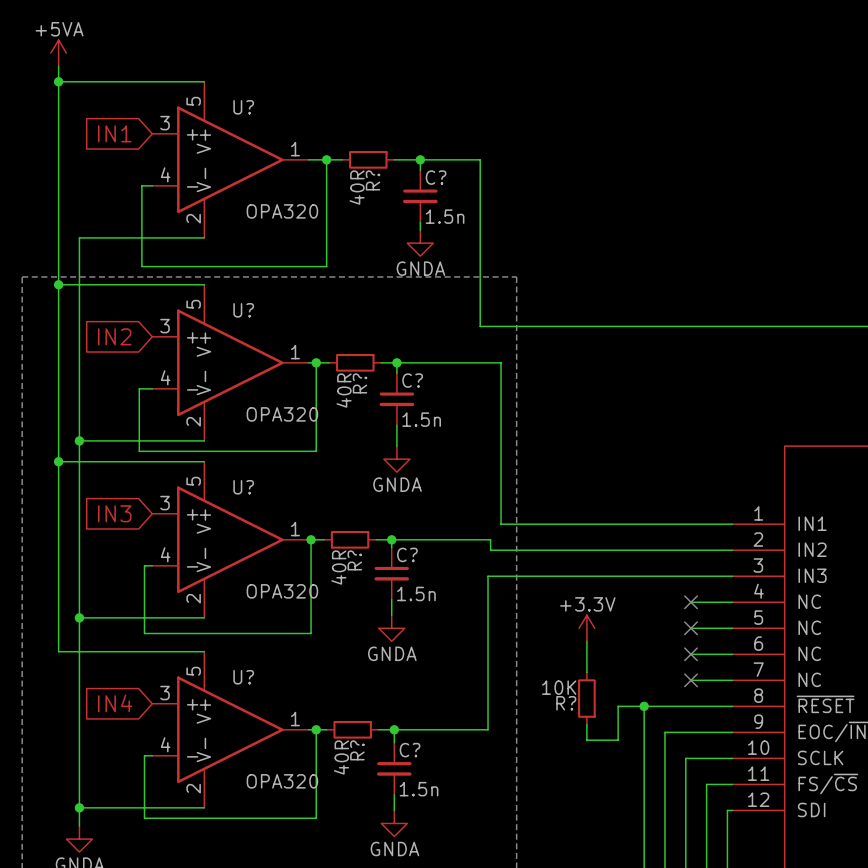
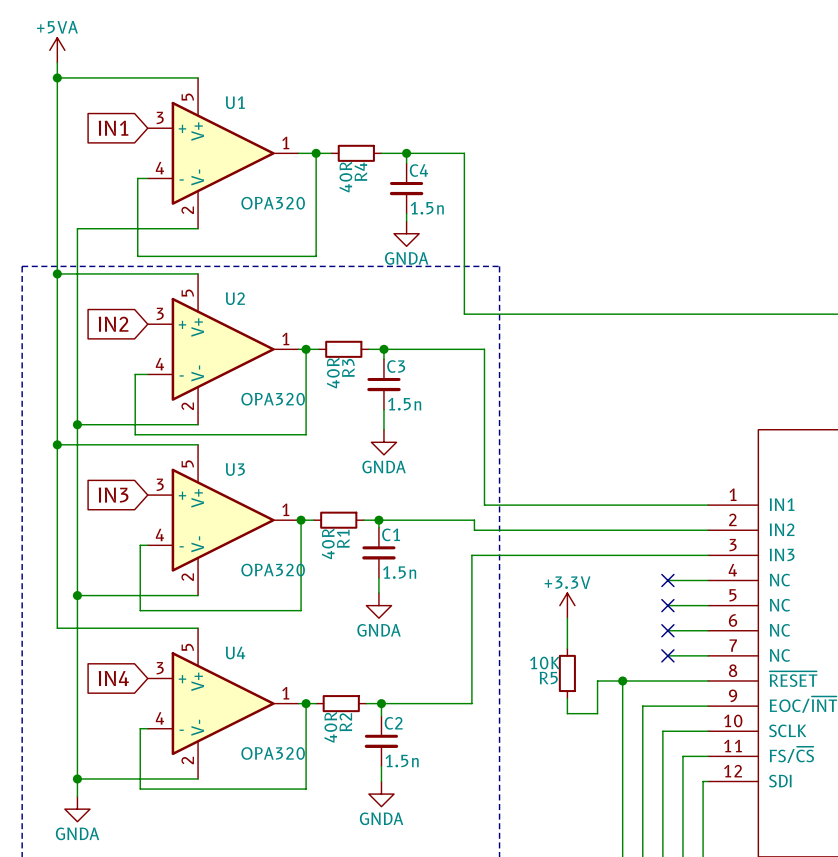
U? name: U? (243, 107) -> U1 (235, 102)
C? name: C? (436, 177) -> C4 (418, 170)
R? name: R? (373, 180) -> R4 (360, 171)
U? name: U? (243, 310) -> U2 (235, 298)
C? name: C? (412, 380) -> C3 (396, 366)
R? name: R? (360, 383) -> R3 (348, 367)
U? name: U? (243, 487) -> U3 (235, 469)
C? name: C? (407, 554) -> C1 (391, 534)
R? name: R? (354, 560) -> R1 (343, 538)
U? name: U? (243, 677) -> U4 (235, 652)
R? name: R? (566, 703) -> R5 (548, 678)
R? name: R? (357, 750) -> R2 (345, 722)
C? name: C? (410, 750) -> C2 (393, 723)

